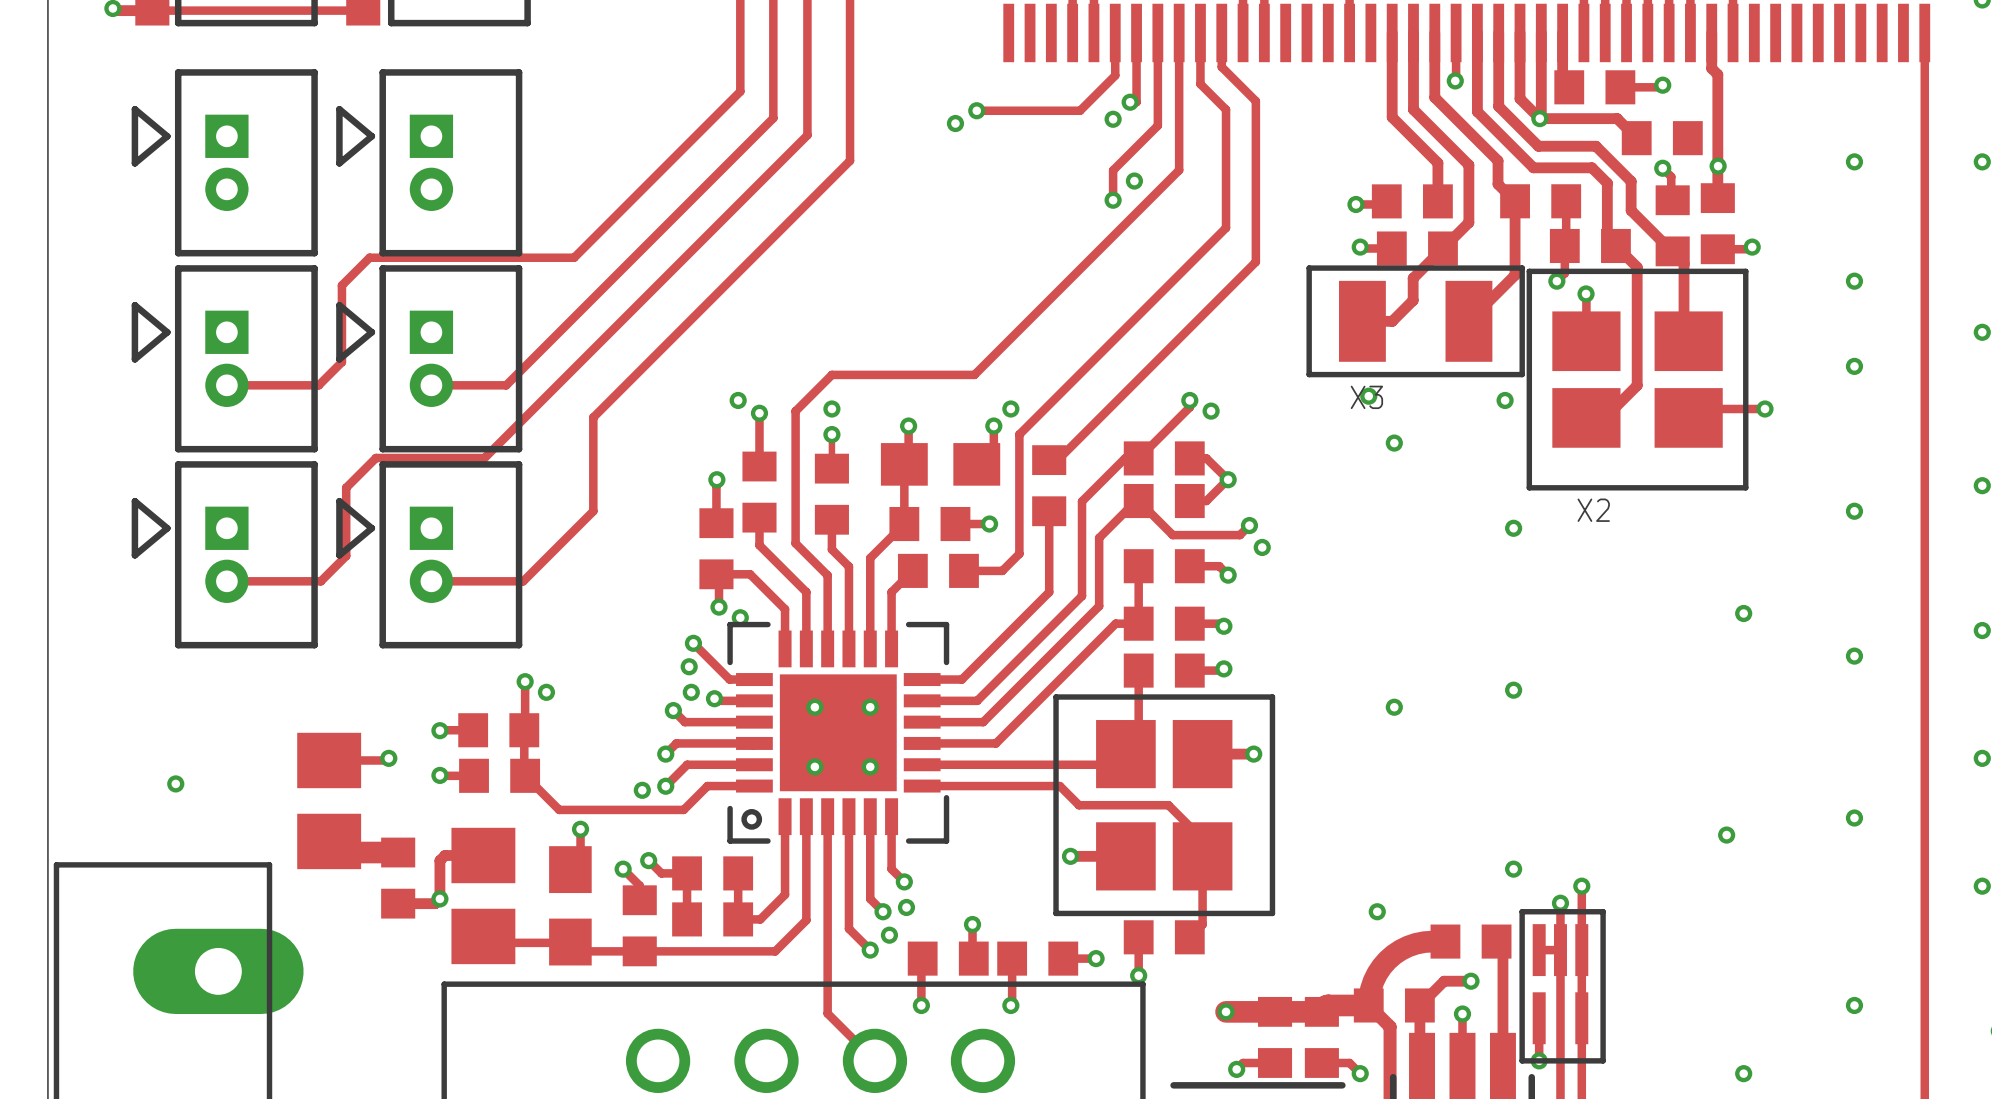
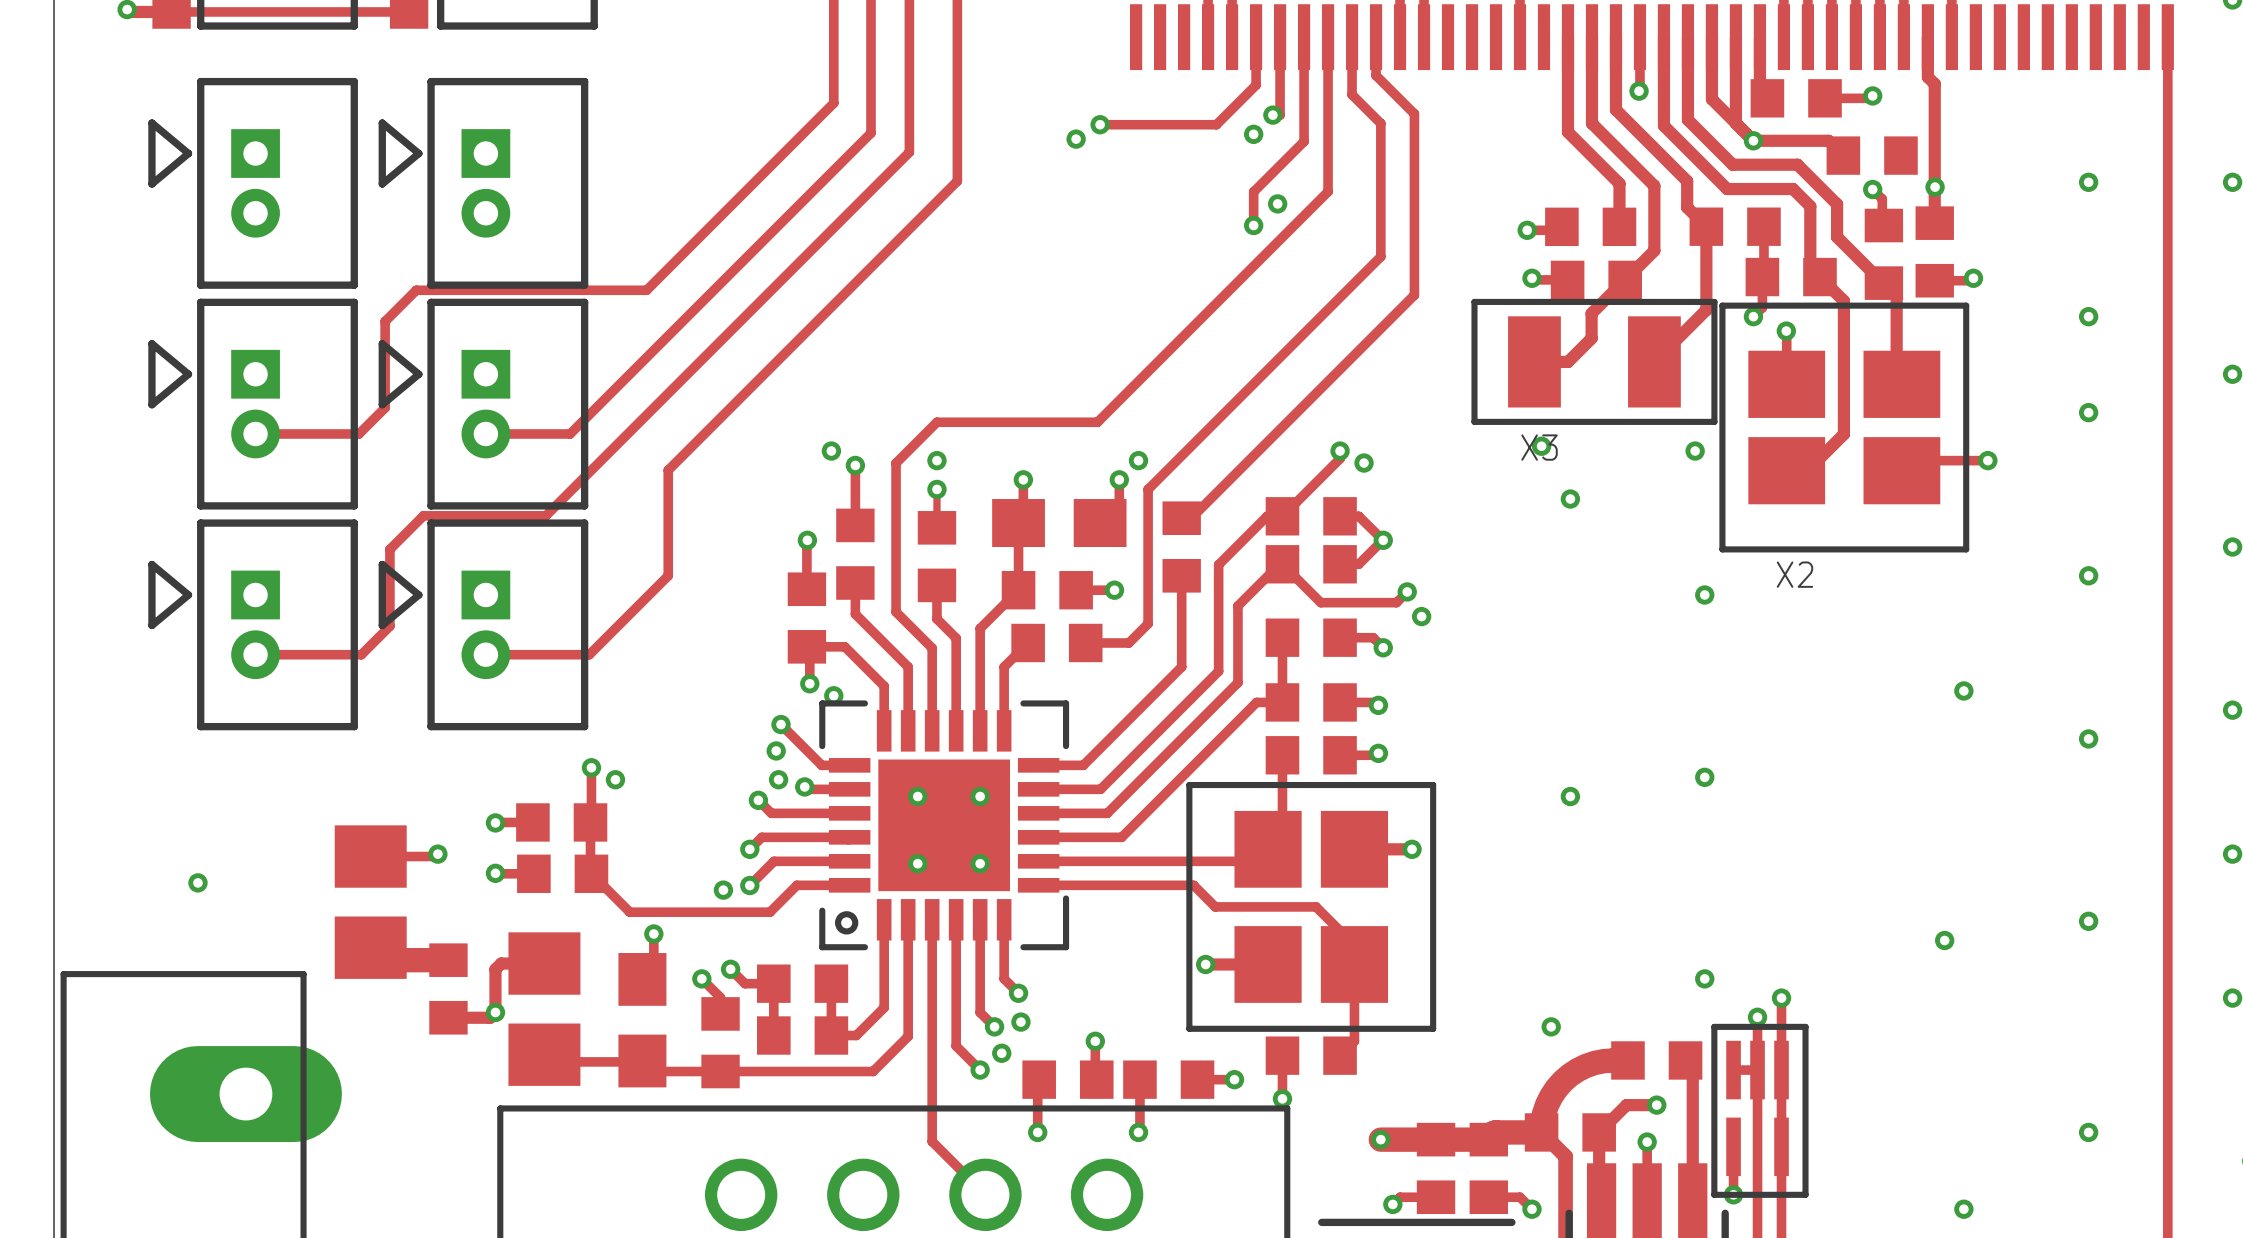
track: (1520, 88) (1520, 98) (1539, 118) -> none
track: (1539, 118) (1617, 118) (1623, 125) -> (1711, 99) (1753, 140) (1828, 140)
via position: (1539, 118) -> (1753, 140)

